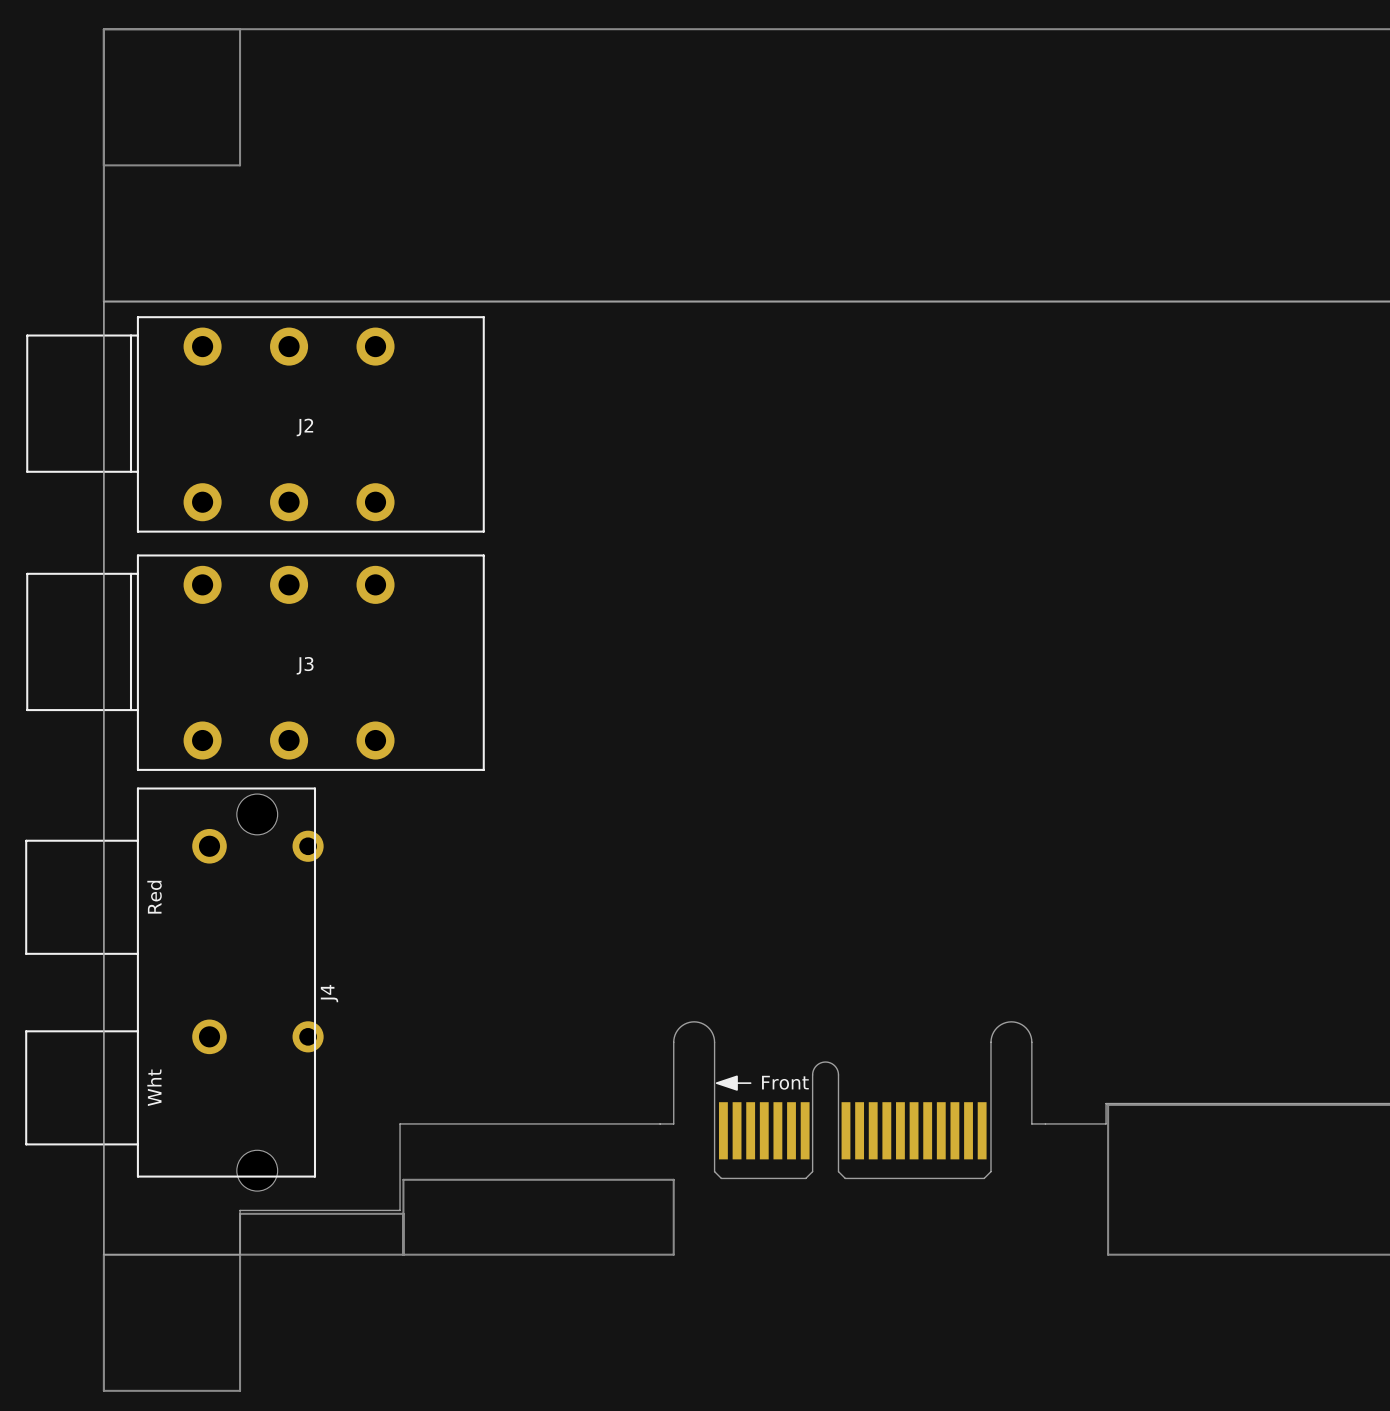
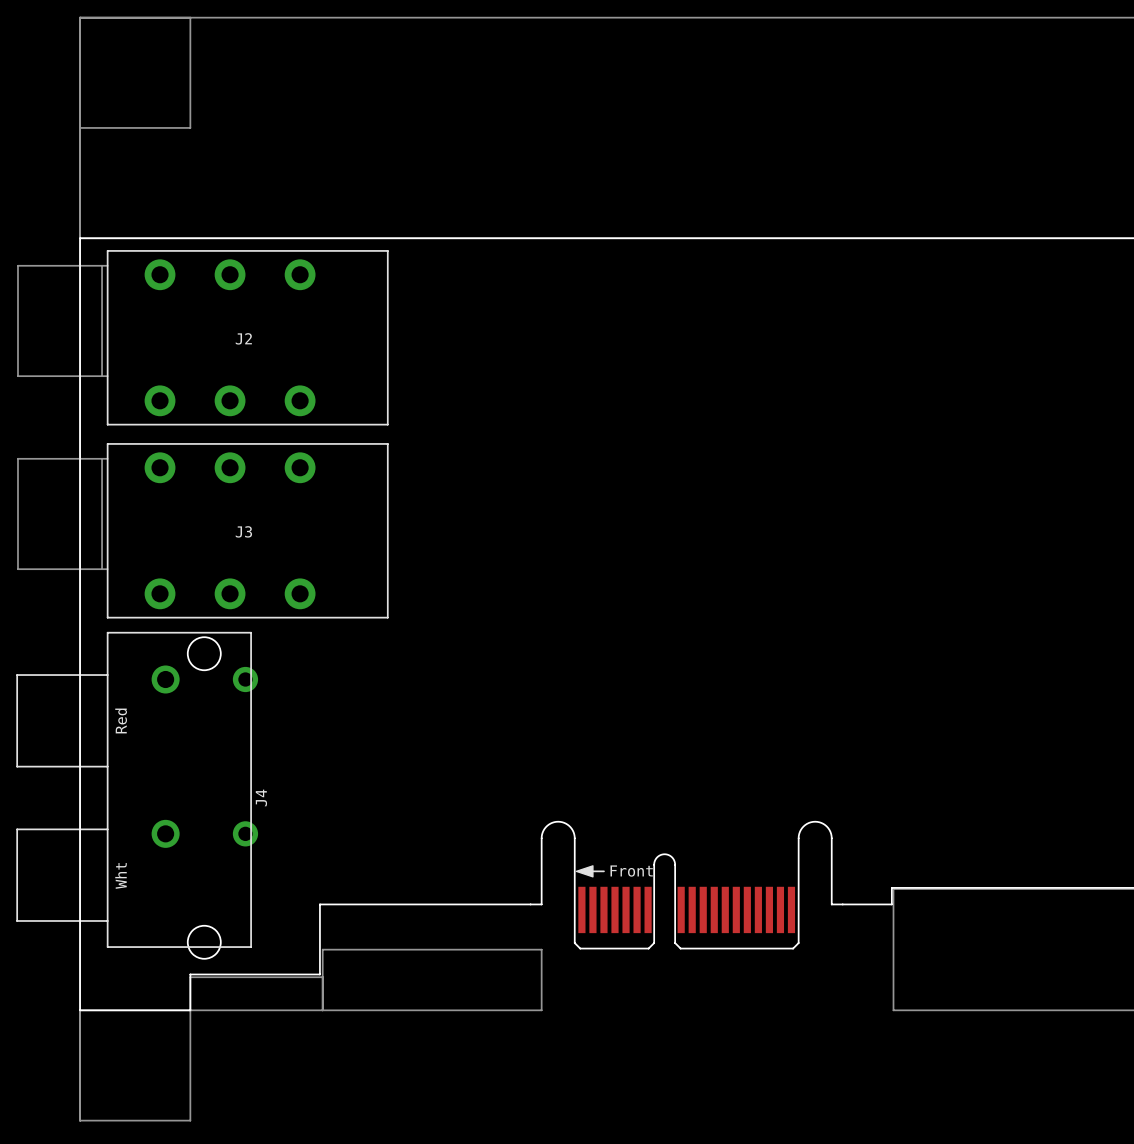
J2 footprint: [26, 316, 485, 533] -> [17, 250, 389, 426]
J3 footprint: [26, 554, 485, 771] -> [17, 443, 389, 619]

